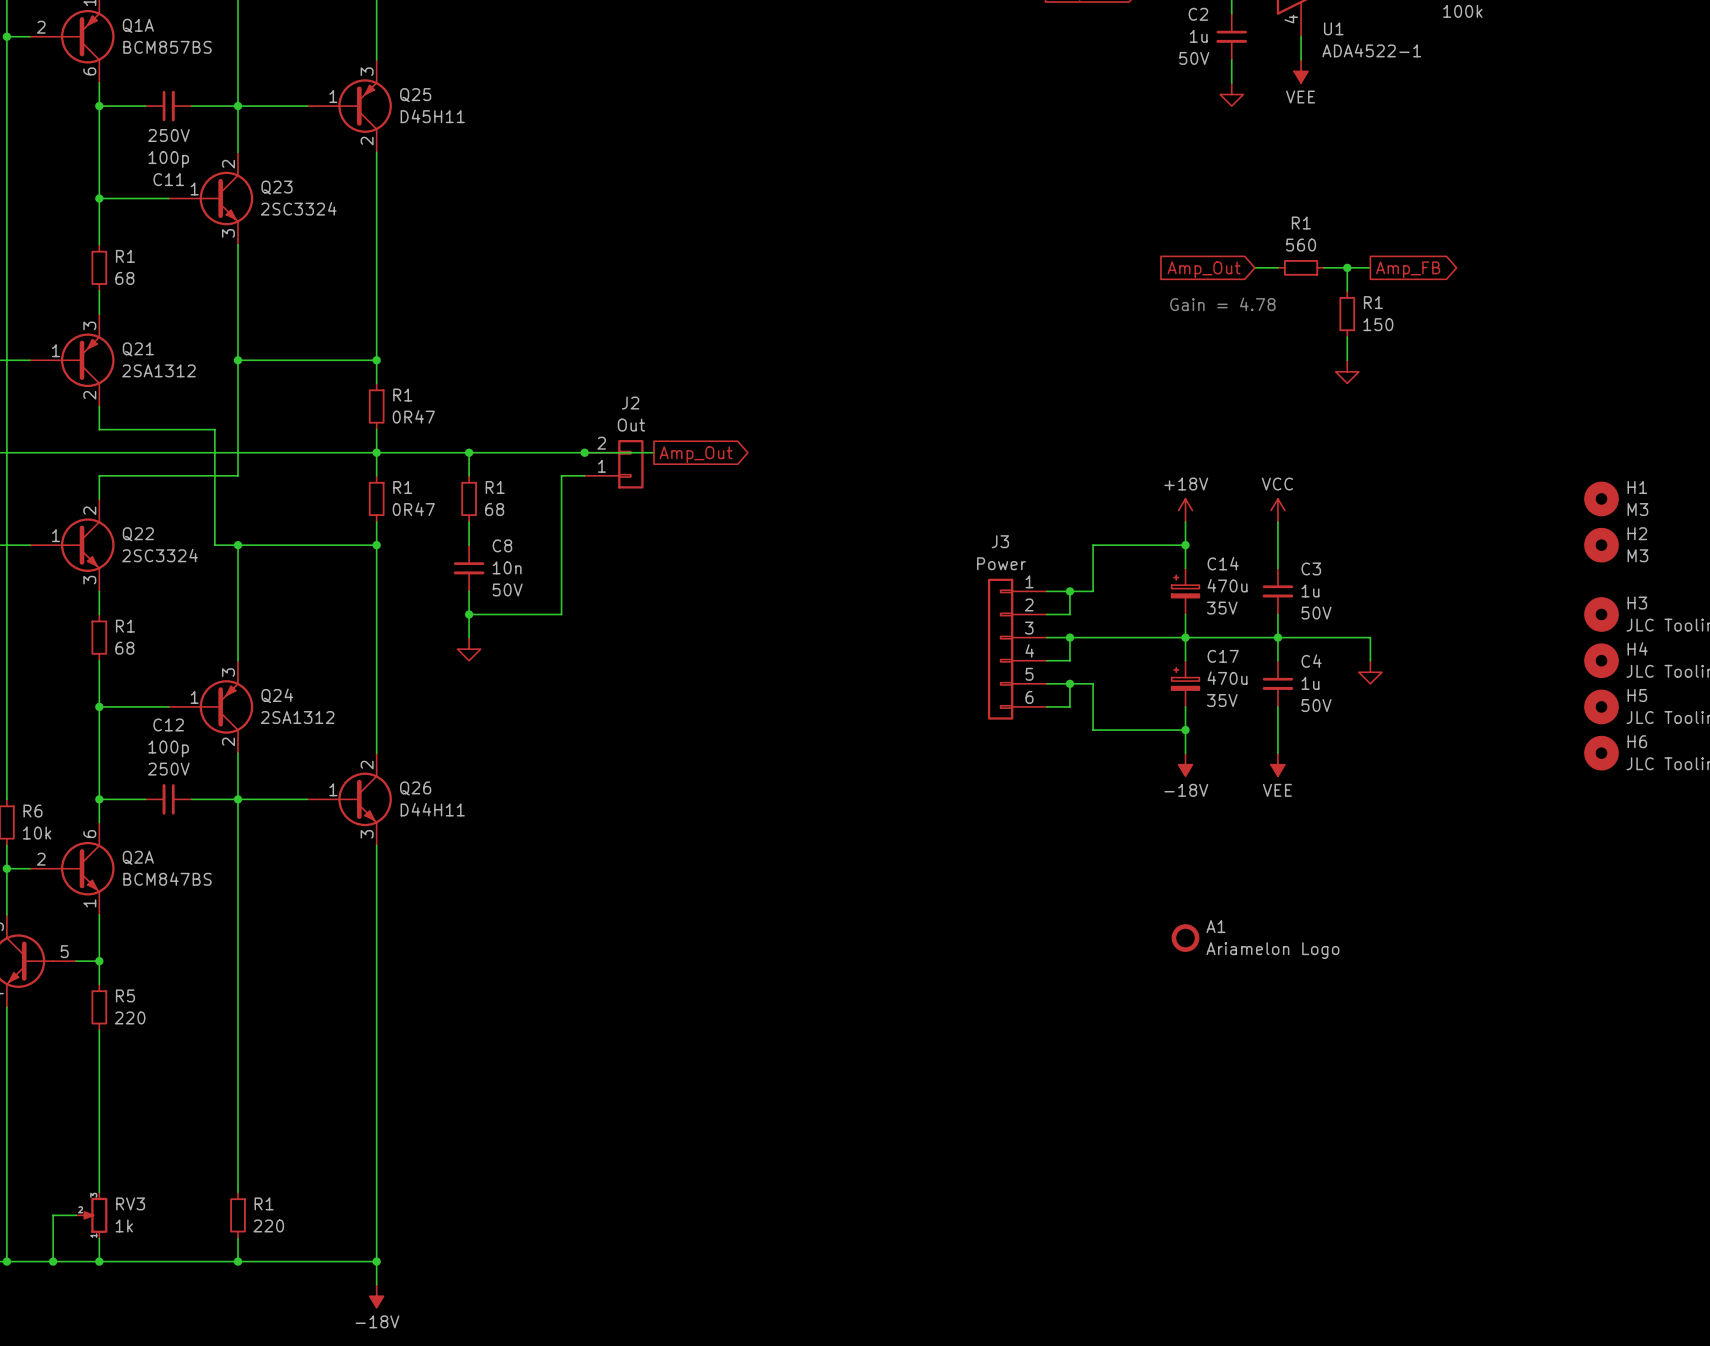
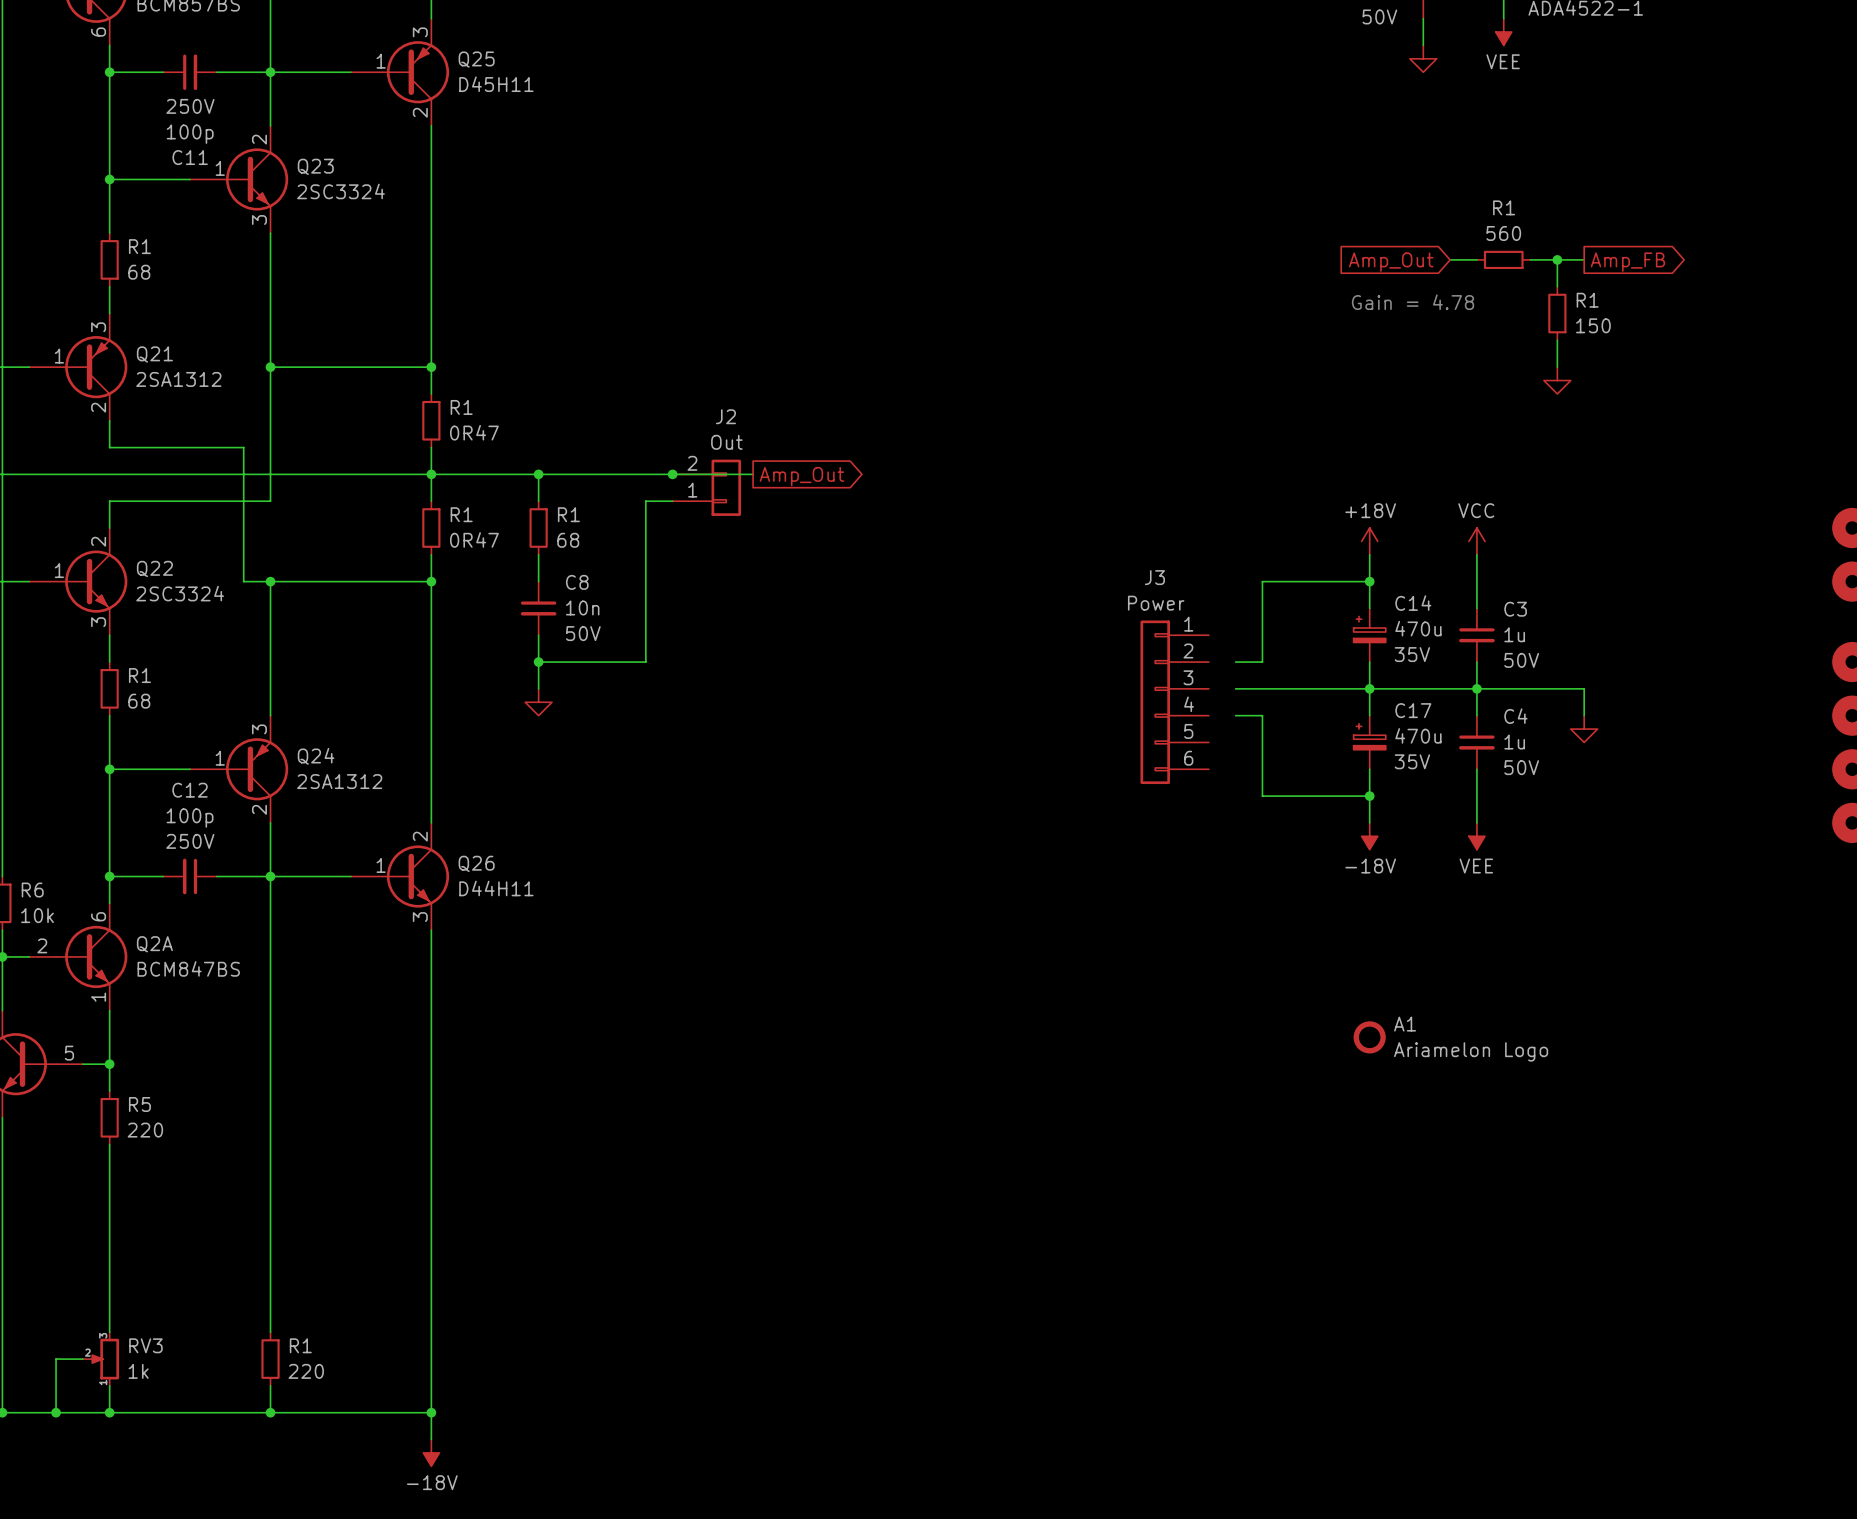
wire: (1046, 591) (1093, 591) -> (1235, 662) (1262, 662) (1262, 635)
wire: (1069, 591) (1069, 614) (1046, 614) -> none
junction: (1069, 591) -> none
wire: (1046, 637) (1069, 637) (1069, 660) (1046, 660) -> none
junction: (1069, 637) -> none
wire: (1046, 683) (1093, 683) -> (1235, 715) (1262, 715) (1262, 742)
wire: (1069, 683) (1069, 706) (1046, 706) -> none
junction: (1069, 683) -> none

